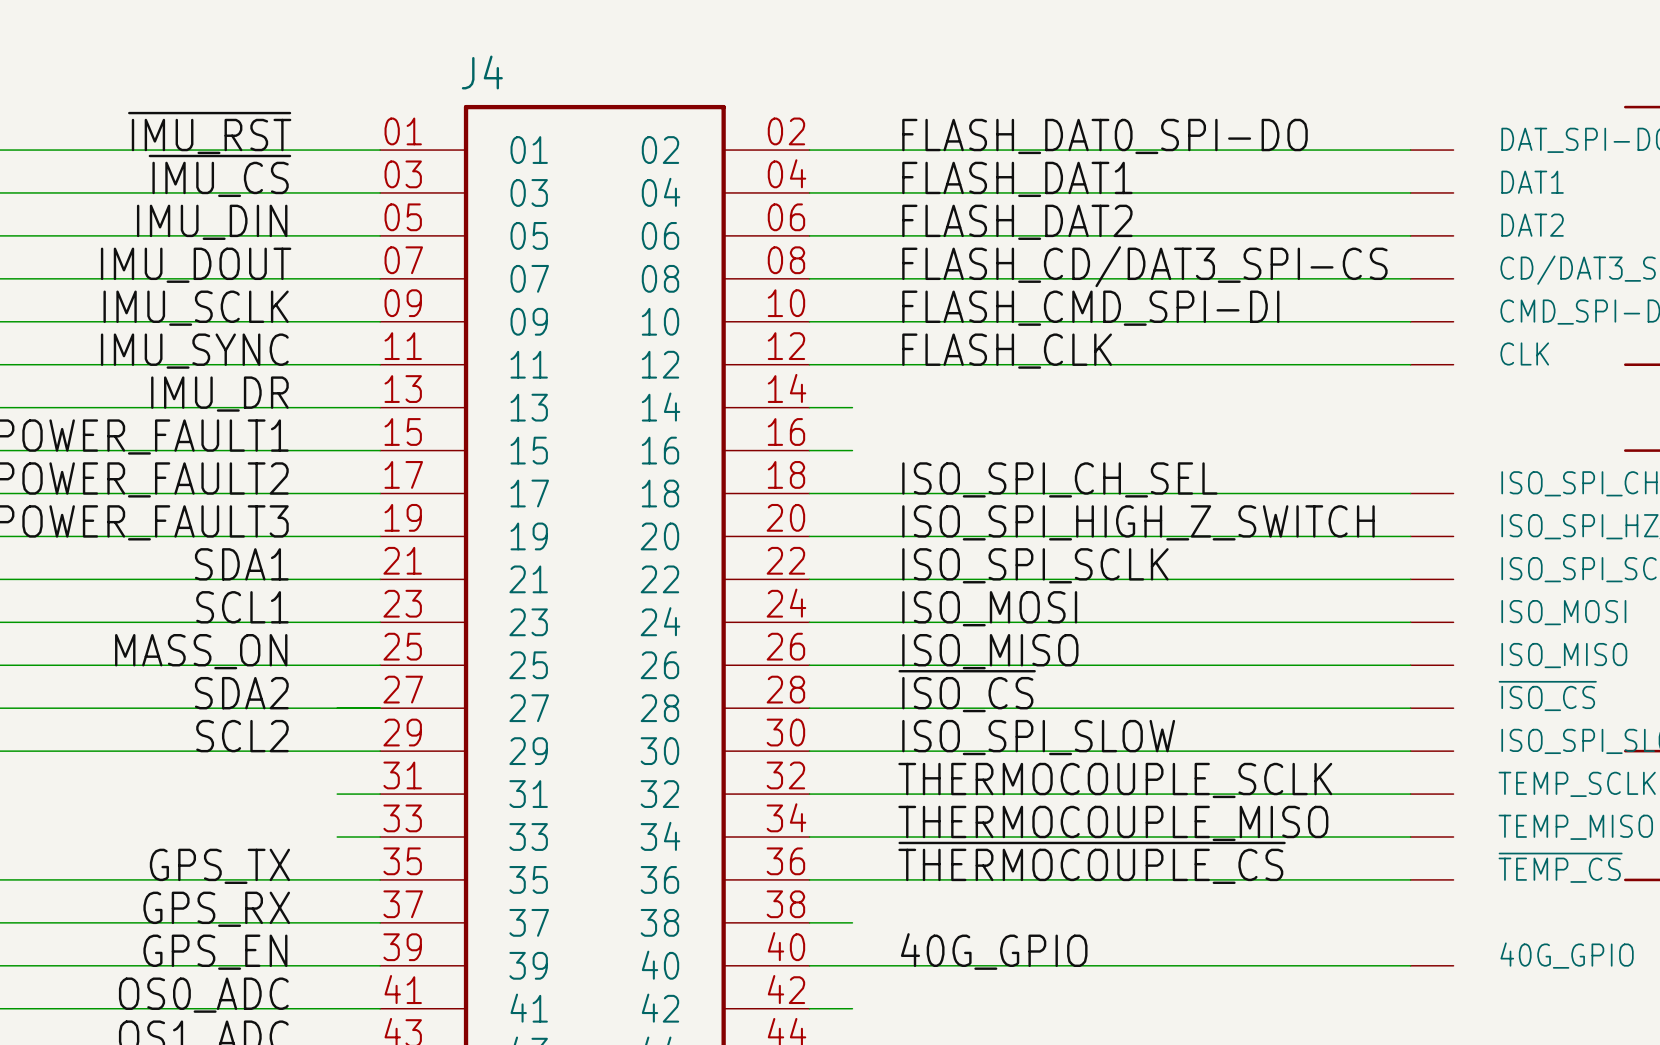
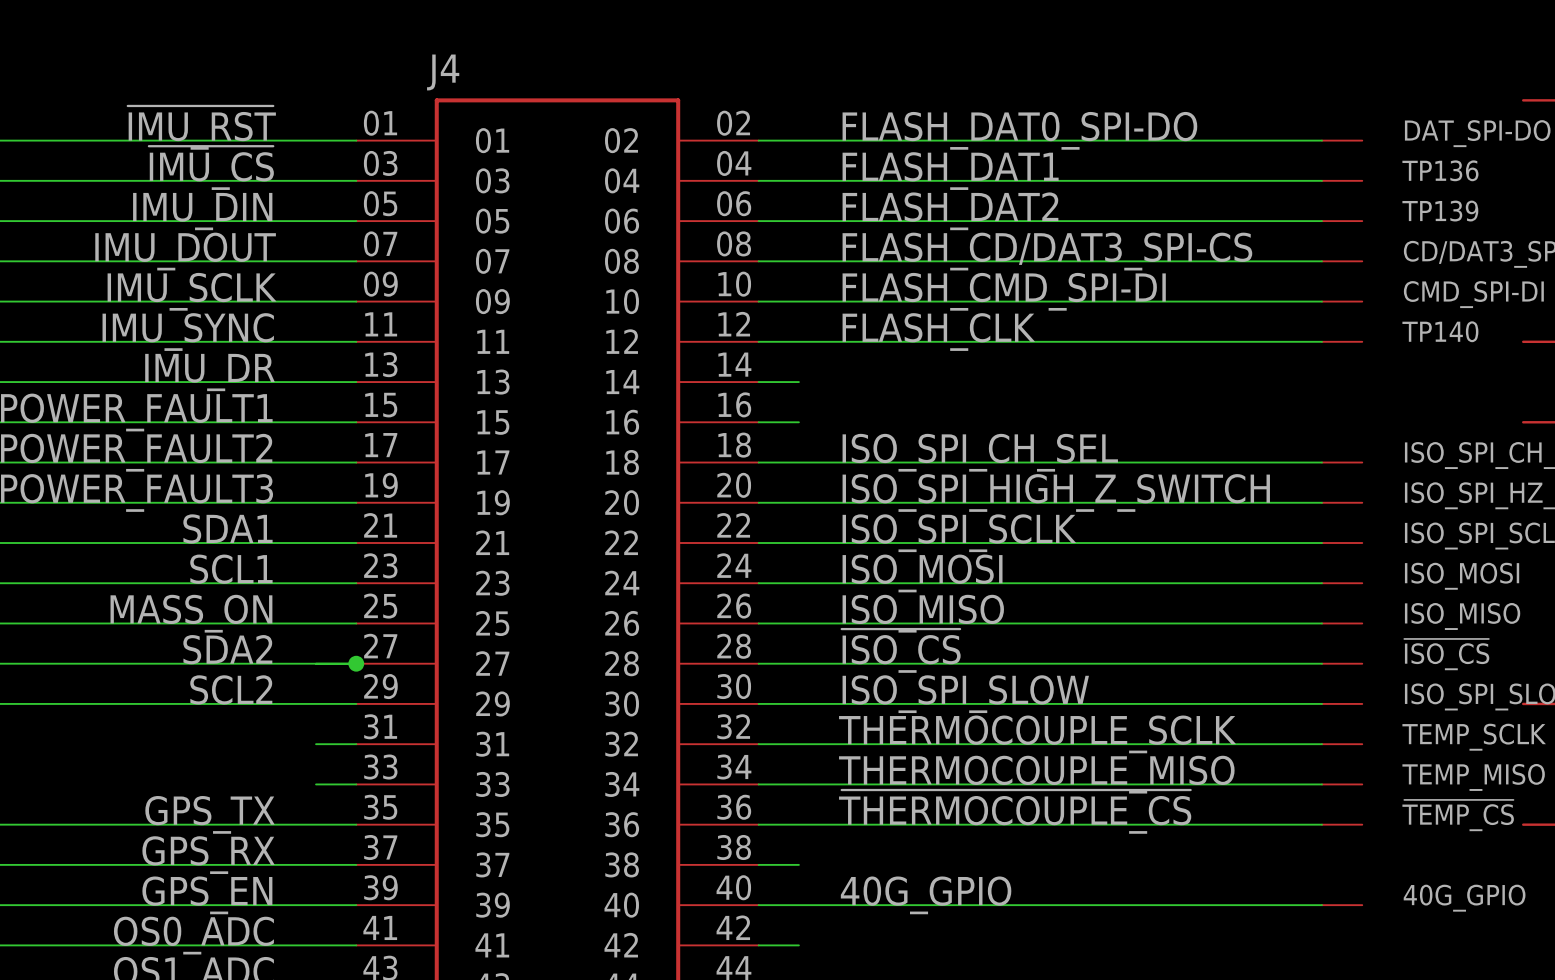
DAT1 name: DAT1 (1532, 182) -> TP136 (1440, 170)
DAT2 name: DAT2 (1532, 225) -> TP139 (1440, 211)
CLK name: CLK (1524, 353) -> TP140 (1440, 331)
junction: none -> (356, 663)

